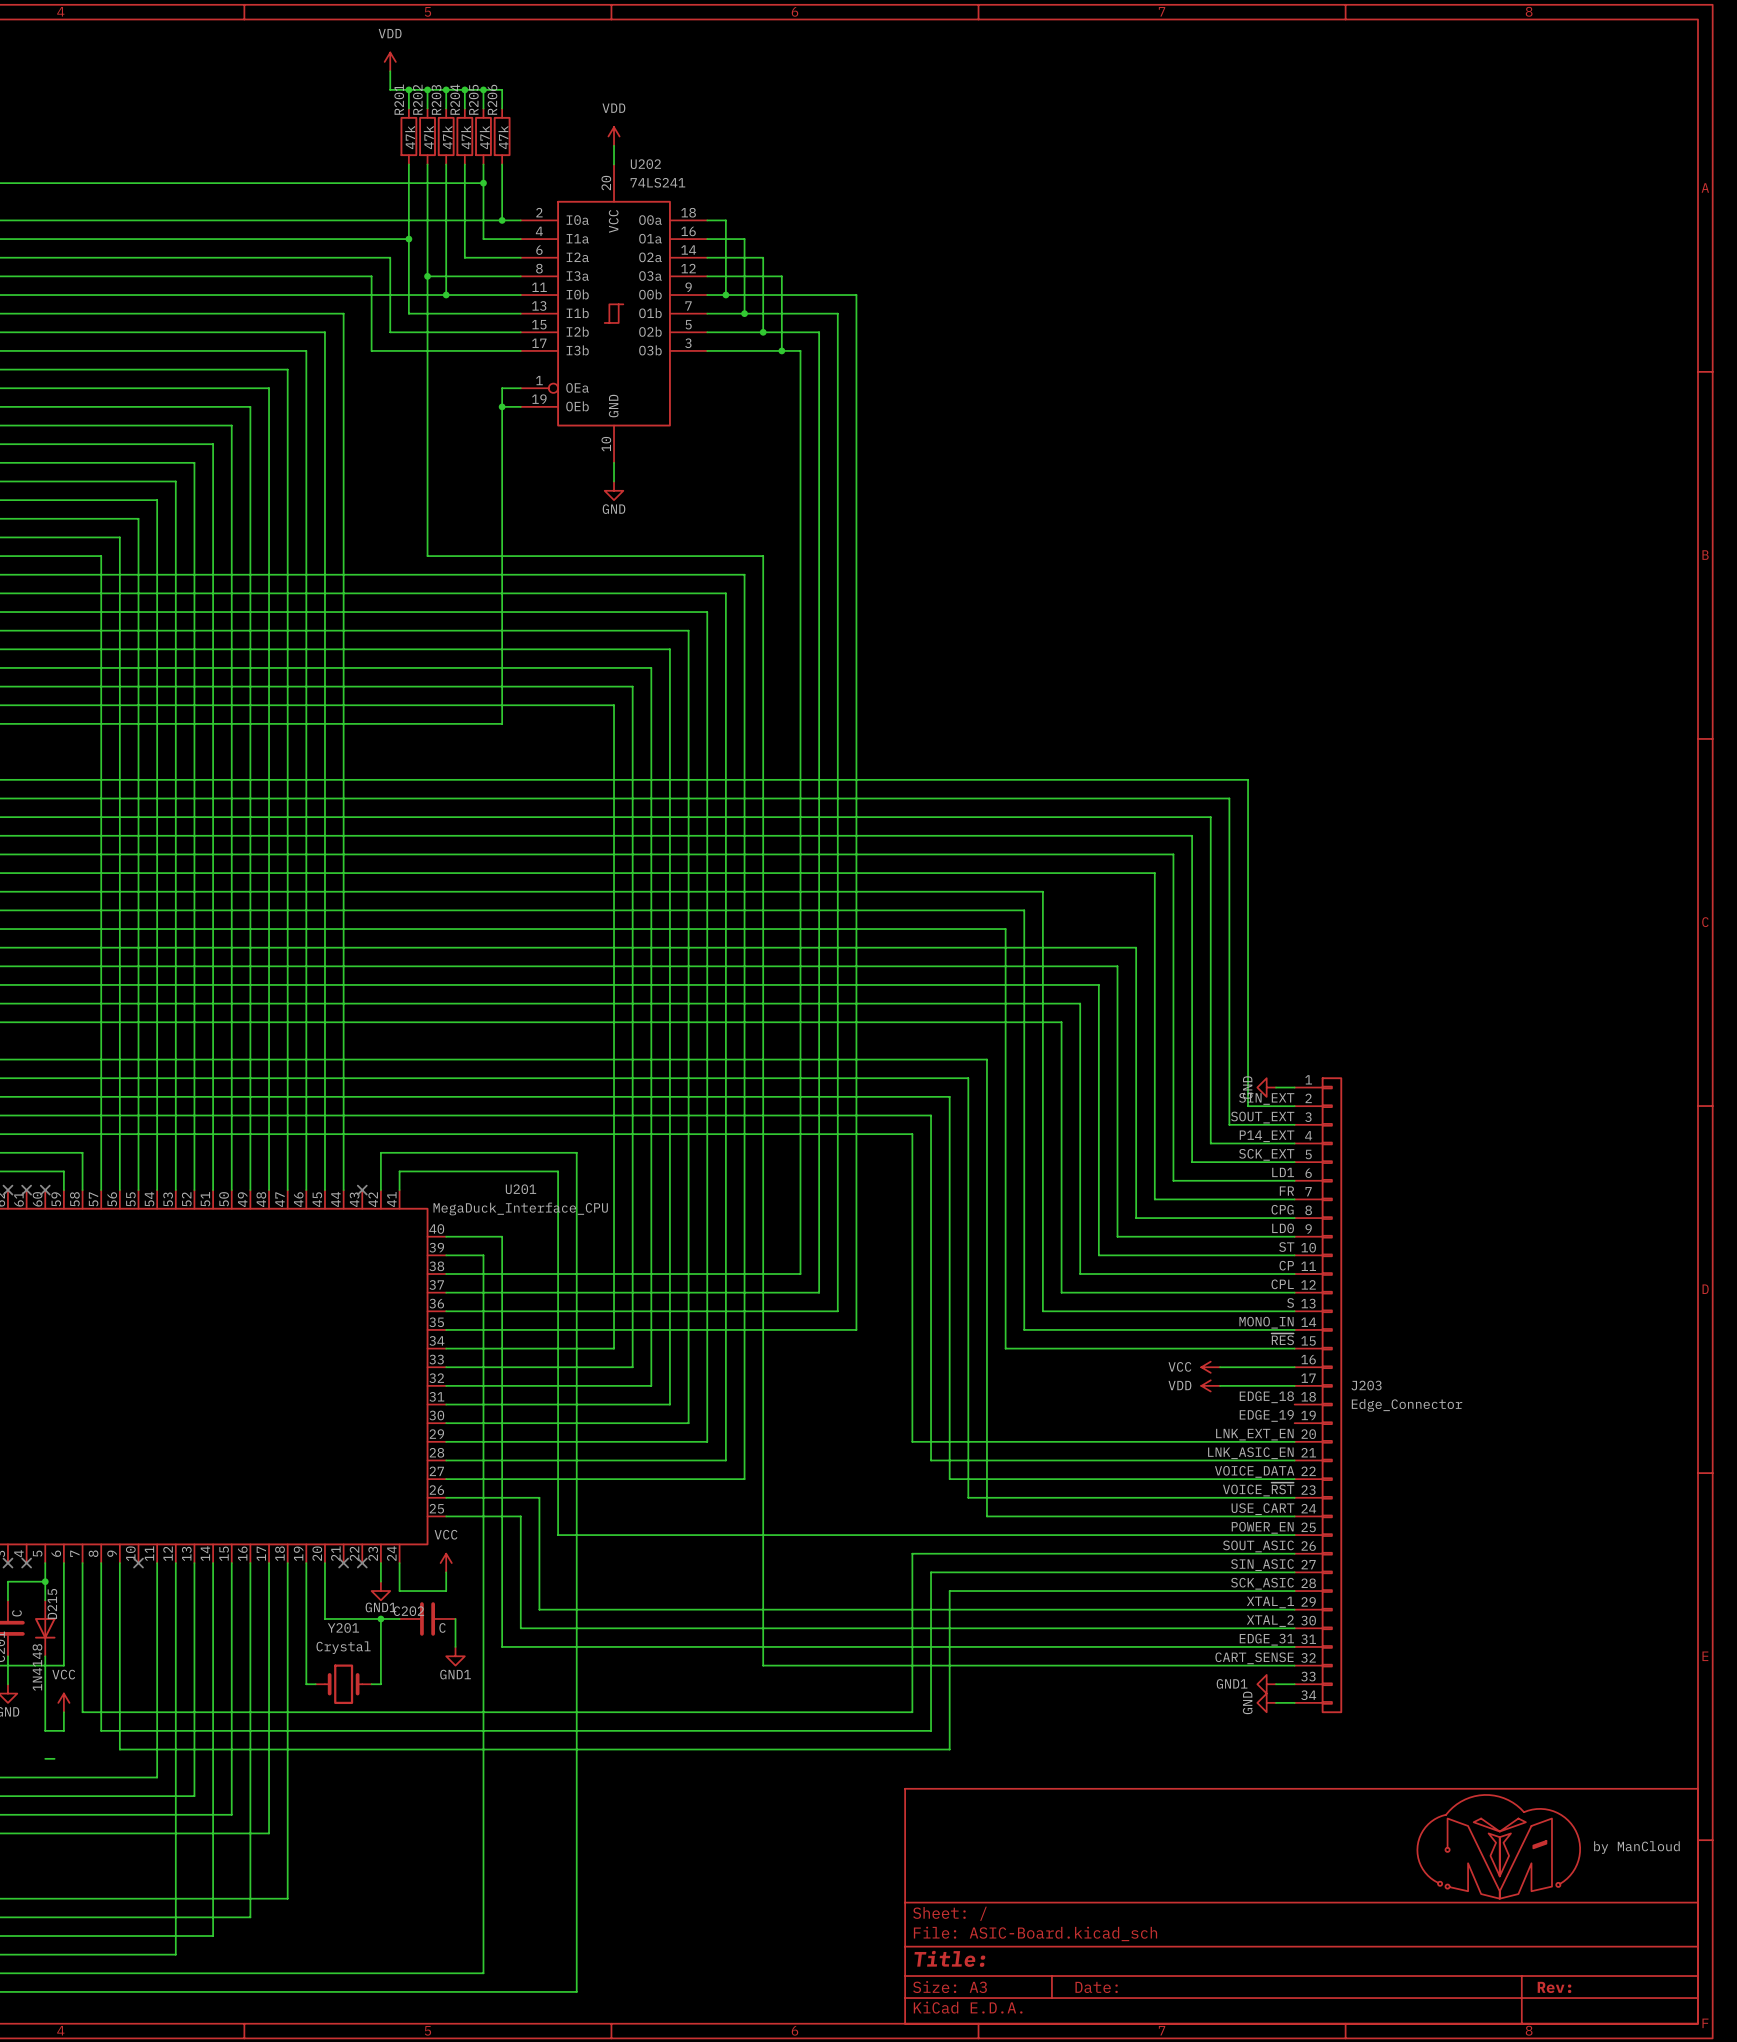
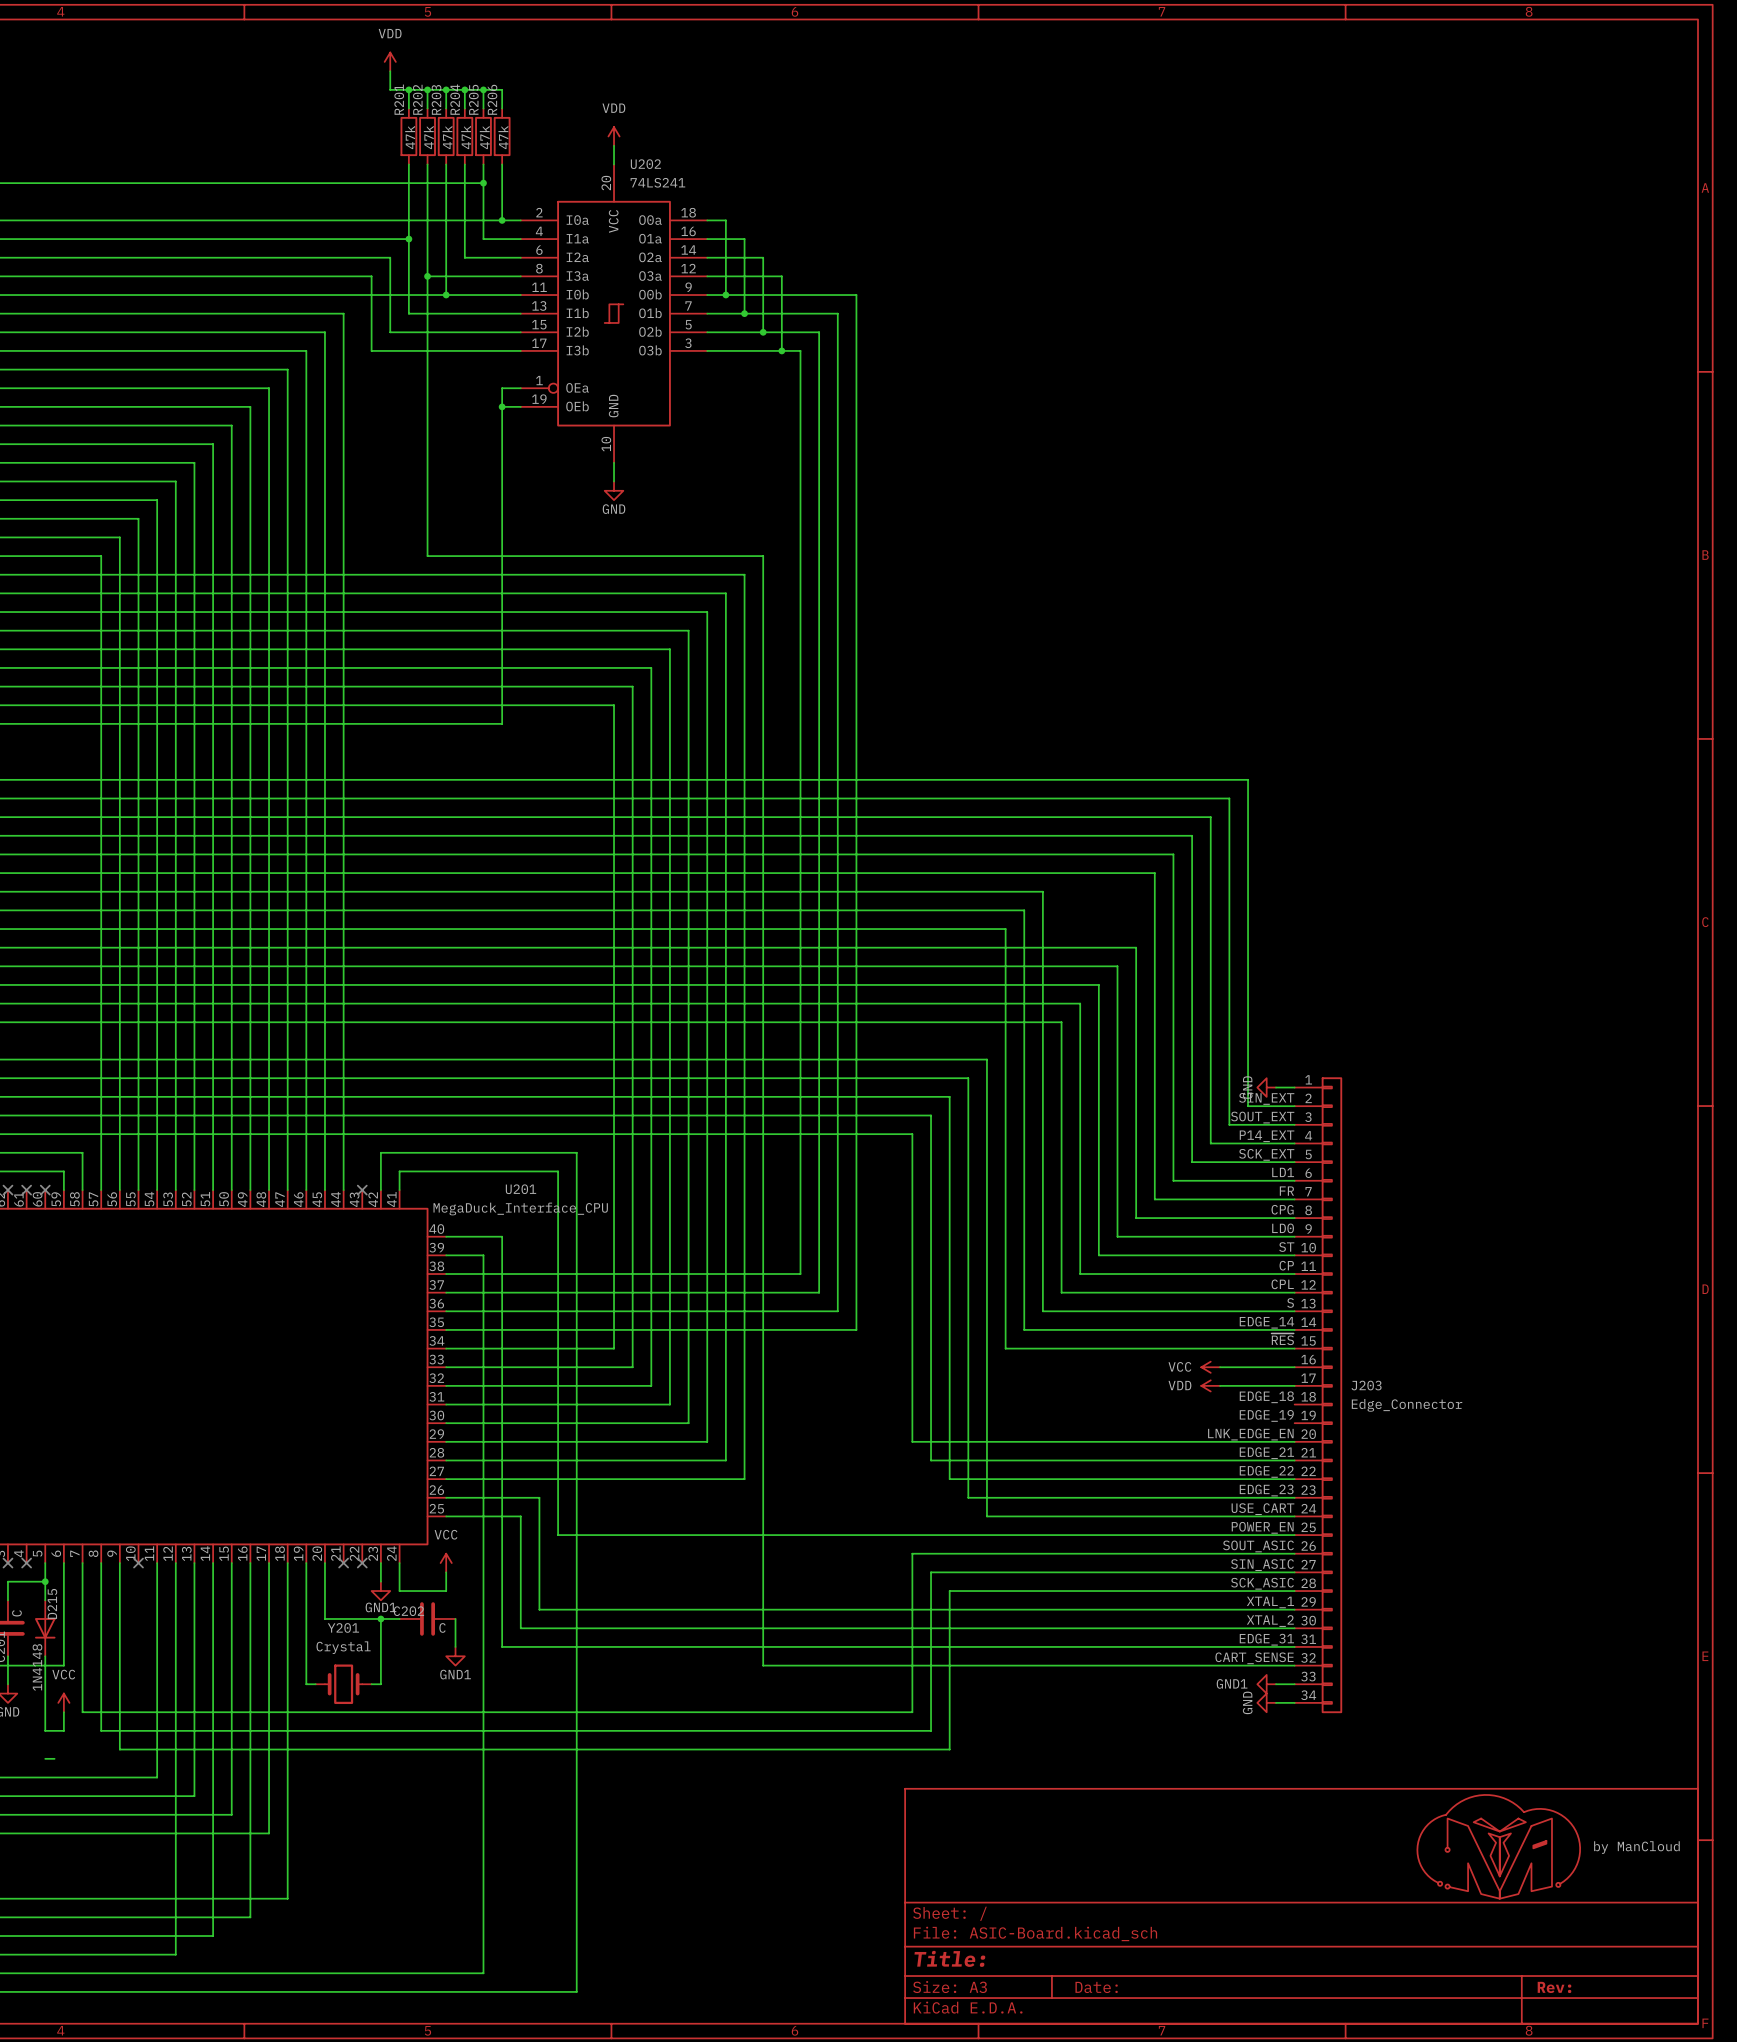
label: MONO_IN (1266, 1322) -> EDGE_14 (1266, 1322)
label: LNK_EXT_EN (1254, 1434) -> LNK_EDGE_EN (1250, 1434)
label: LNK_ASIC_EN (1250, 1453) -> EDGE_21 (1266, 1453)
label: VOICE_DATA (1254, 1471) -> EDGE_22 (1266, 1471)
label: VOICE_~{RST} (1258, 1489) -> EDGE_23 (1266, 1490)

